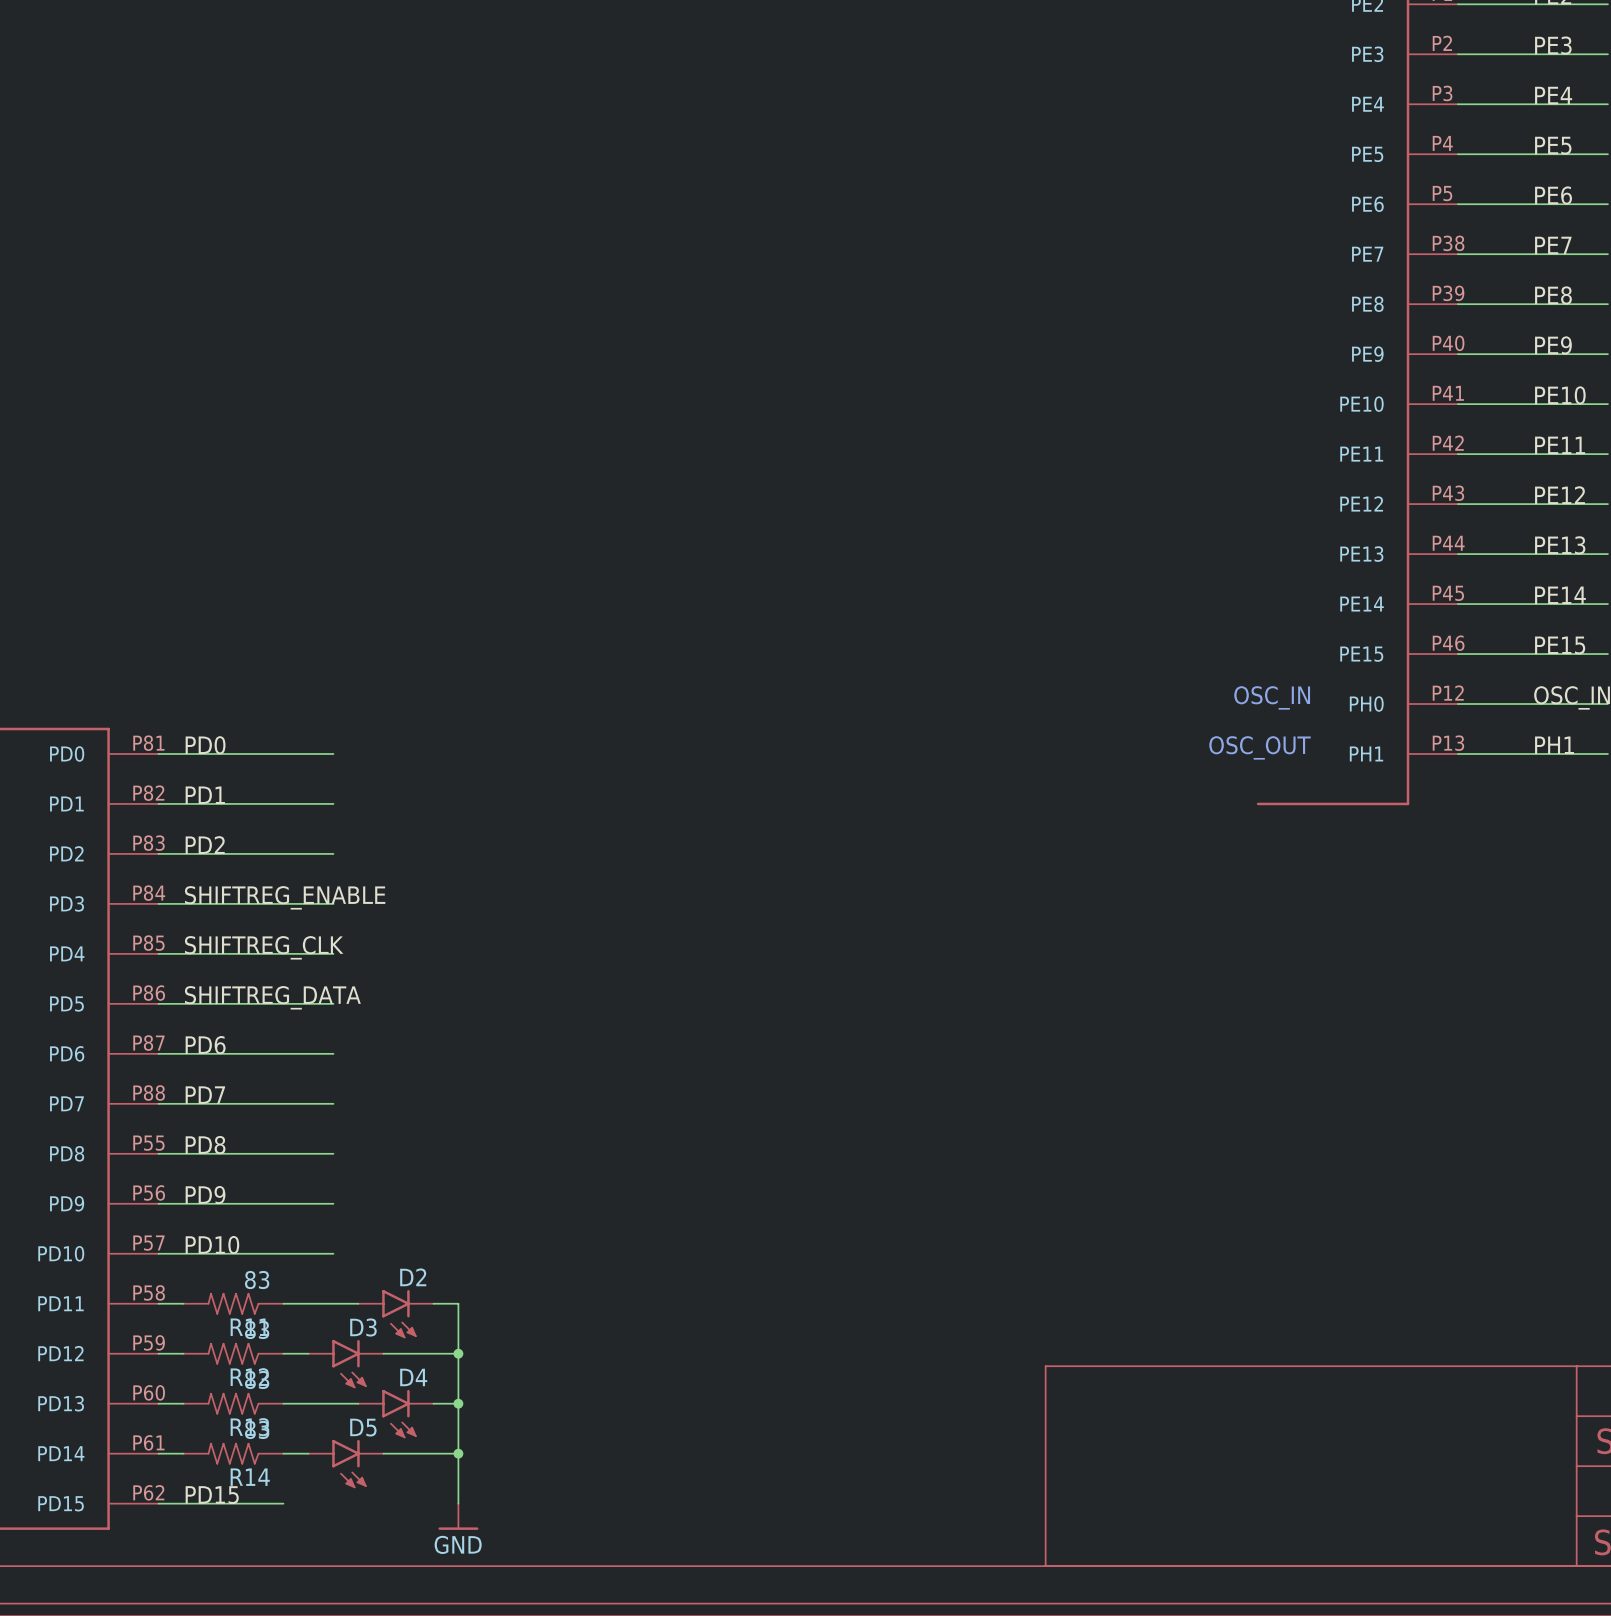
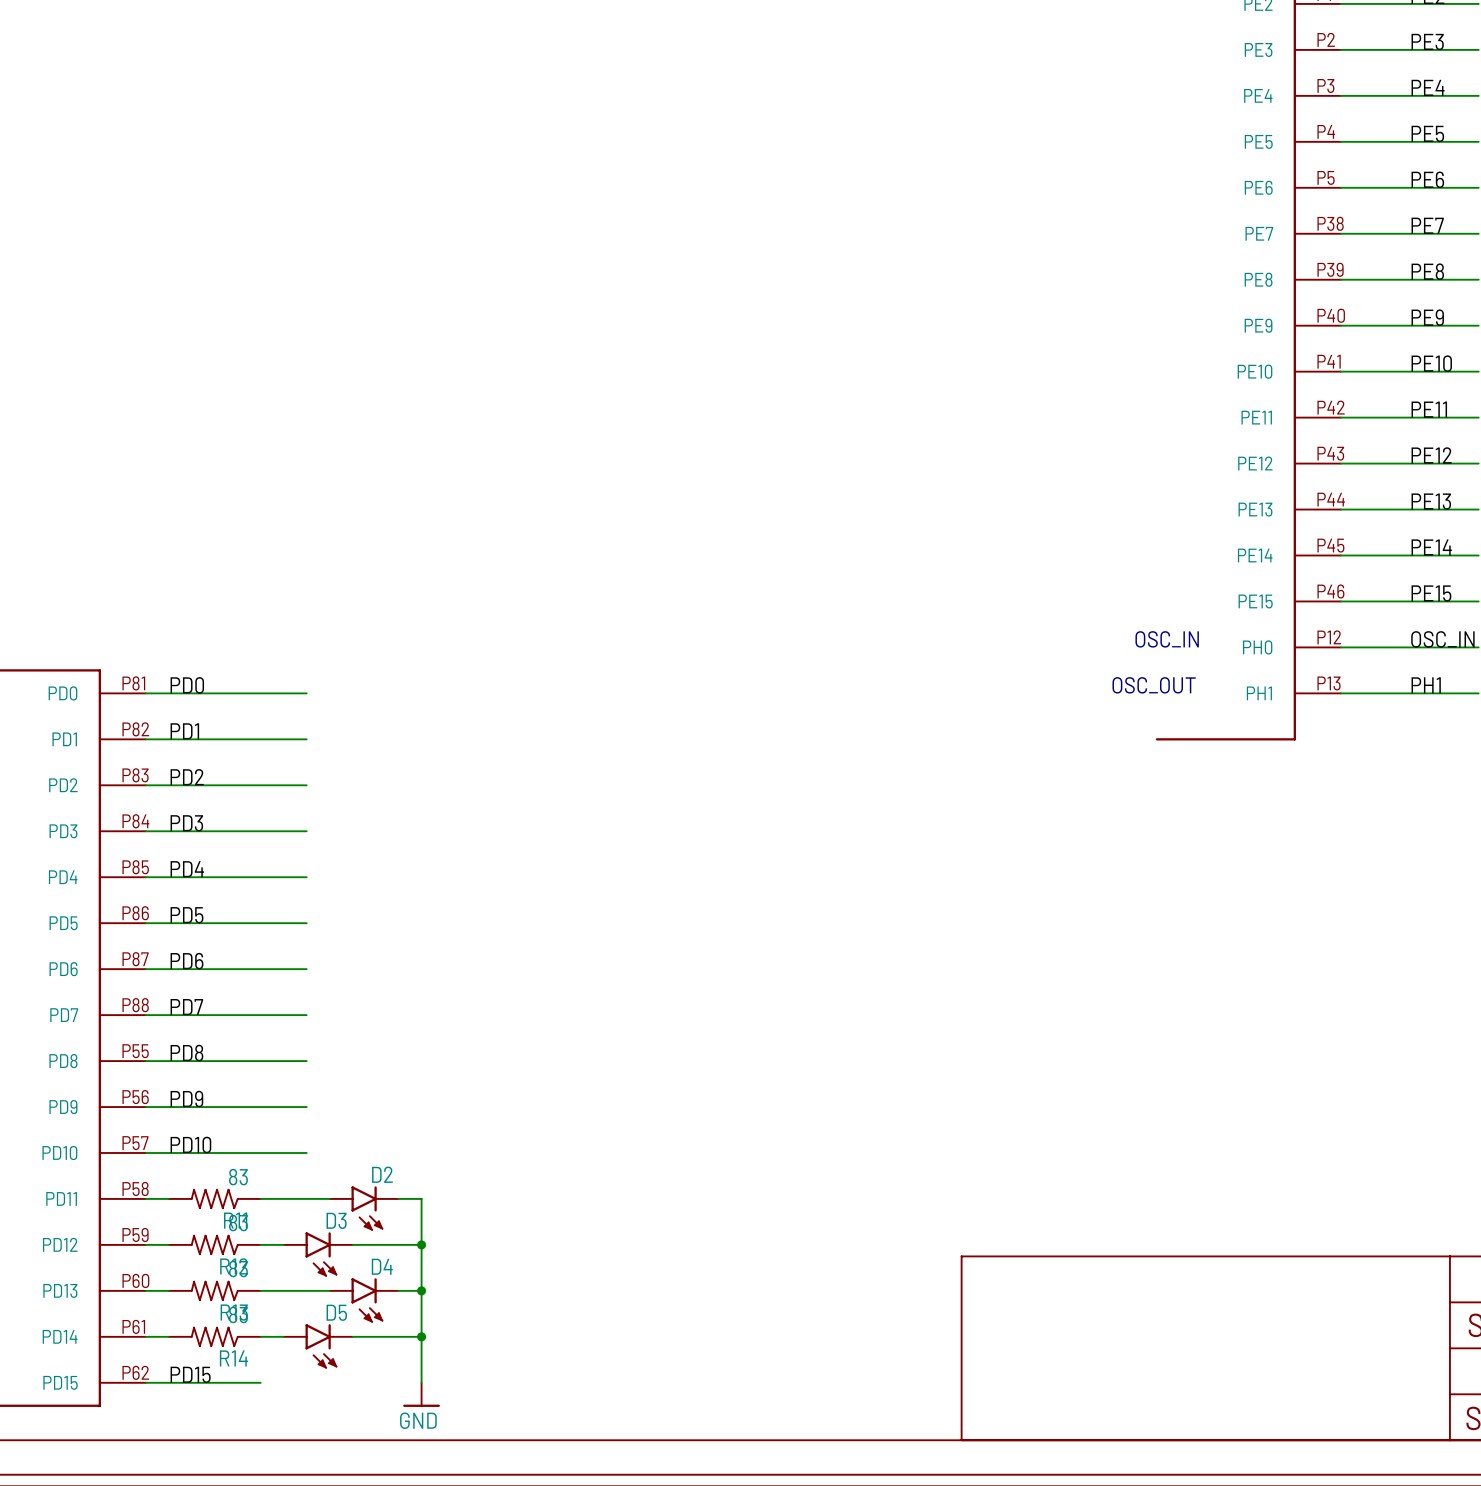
label: SHIFTREG_ENABLE (285, 897) -> PD3 (186, 823)
label: SHIFTREG_CLK (264, 947) -> PD4 (187, 869)
label: SHIFTREG_DATA (272, 997) -> PD5 (186, 915)

